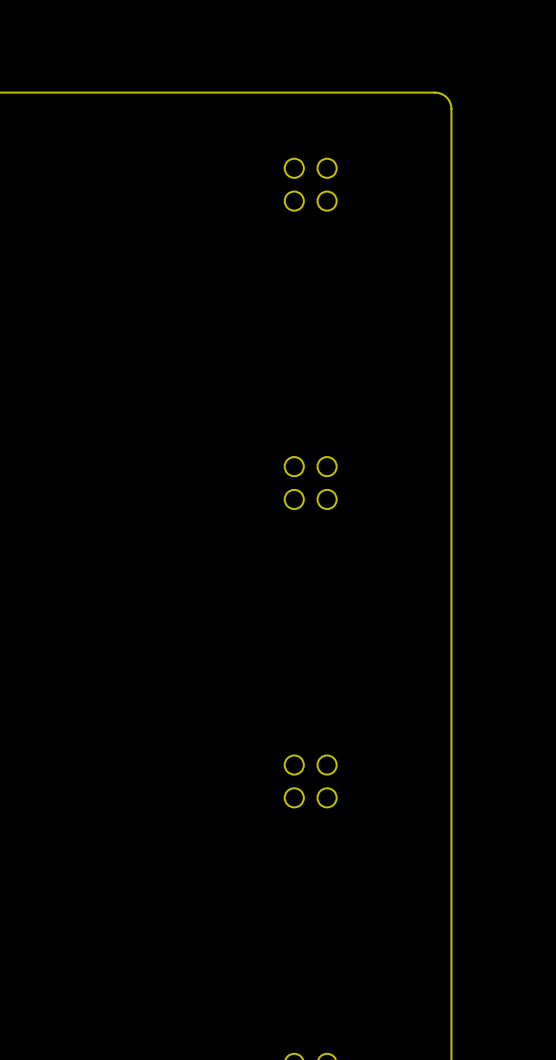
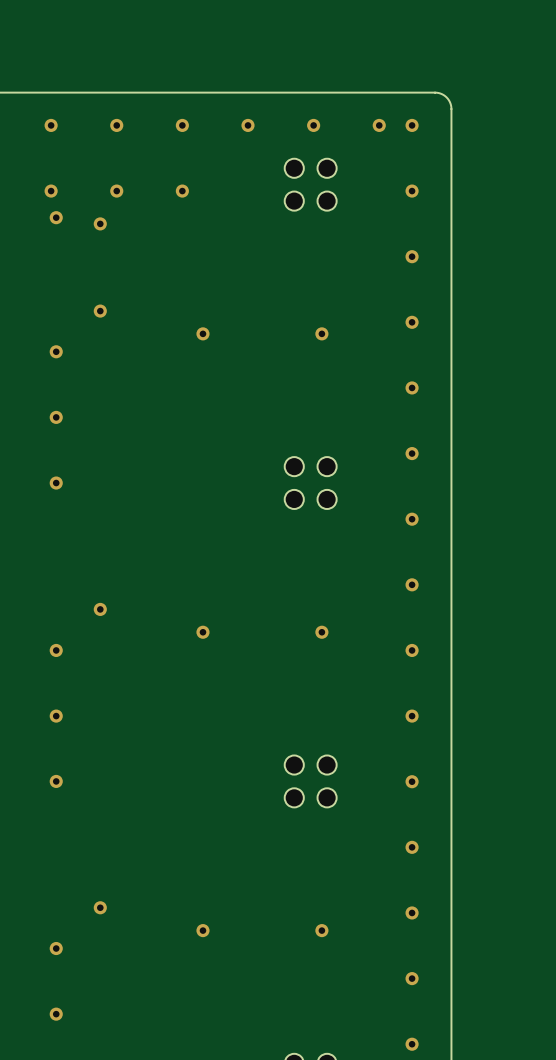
via: none -> (51, 125)
via: none -> (116, 125)
via: none -> (182, 125)
via: none -> (248, 125)
via: none -> (313, 125)
via: none -> (379, 125)
via: none -> (412, 125)
via: none -> (51, 191)
via: none -> (116, 191)
via: none -> (182, 191)
via: none -> (412, 191)
via: none -> (56, 217)
via: none -> (100, 223)
via: none -> (412, 256)
via: none -> (100, 311)
via: none -> (412, 322)
via: none -> (202, 333)
via: none -> (321, 333)
via: none -> (56, 351)
via: none -> (412, 387)
via: none -> (56, 417)
via: none -> (412, 453)
via: none -> (56, 483)
via: none -> (412, 519)
via: none -> (412, 584)
via: none -> (100, 609)
via: none -> (202, 632)
via: none -> (321, 632)
via: none -> (56, 650)
via: none -> (412, 650)
via: none -> (56, 716)
via: none -> (412, 716)
via: none -> (56, 781)
via: none -> (412, 781)
via: none -> (412, 847)
via: none -> (100, 907)
via: none -> (412, 912)
via: none -> (202, 930)
via: none -> (321, 930)
via: none -> (56, 948)
via: none -> (412, 978)
via: none -> (56, 1014)
via: none -> (412, 1044)

